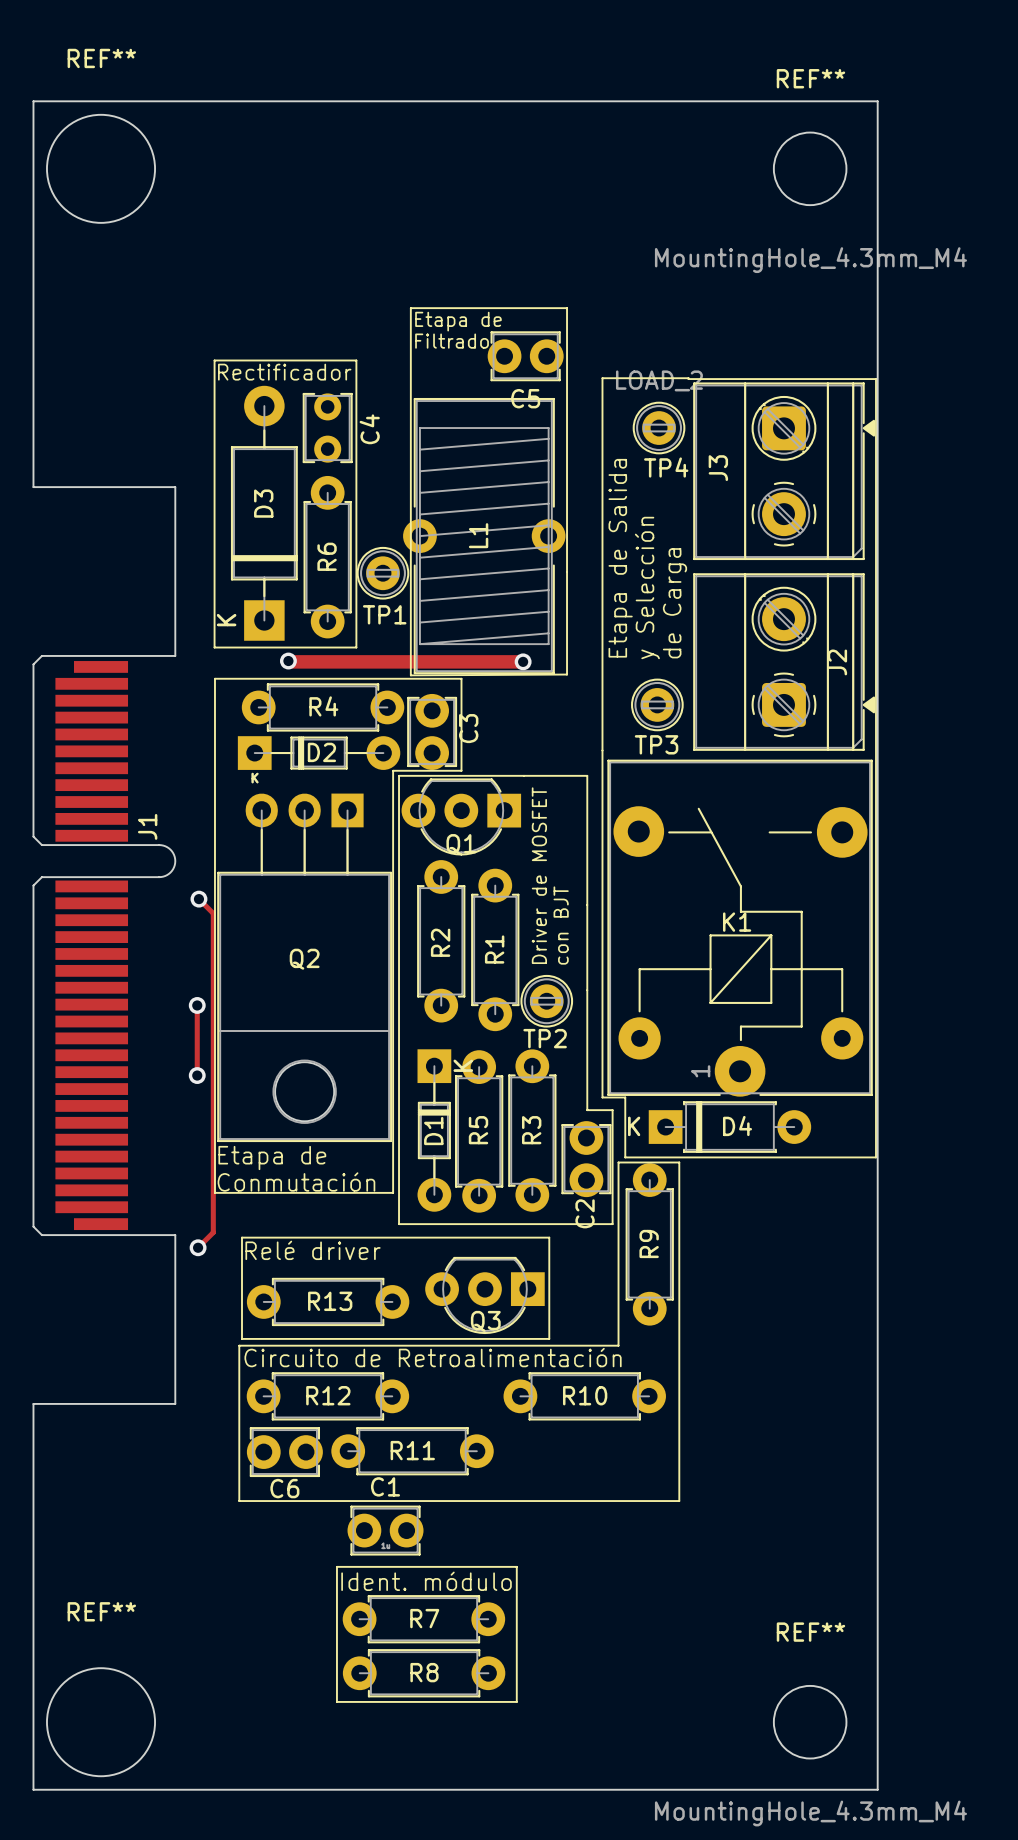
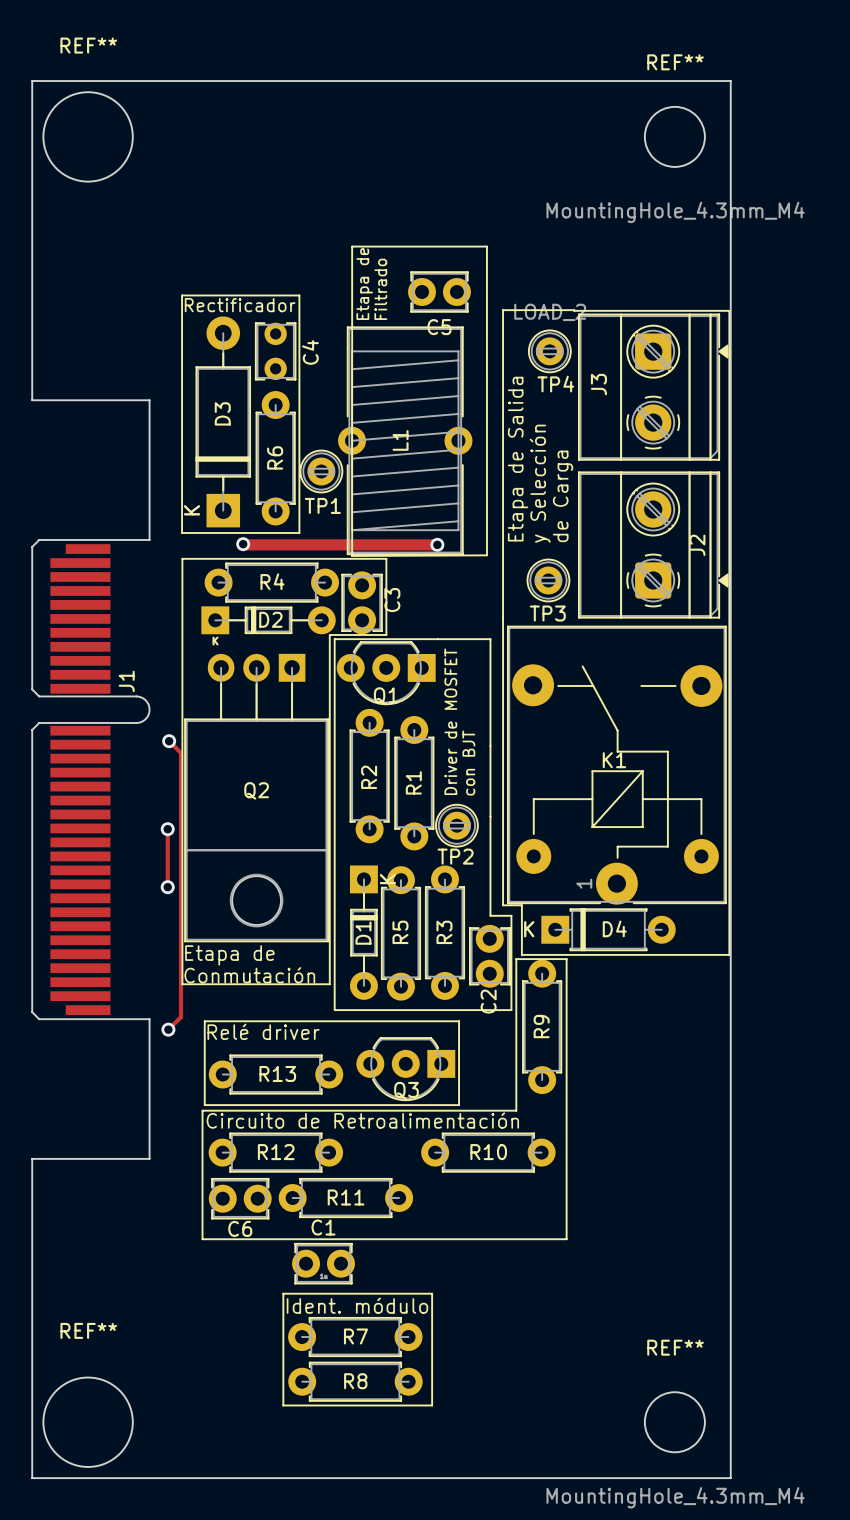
line: (410, 308) (567, 308) (567, 674) (410, 675) (410, 308) -> (352, 246) (352, 556) (486, 555) (486, 246) (352, 246)
text rotation: 0° (458, 321) -> 90° counterclockwise (364, 284)
text rotation: 0° (452, 341) -> 90° counterclockwise (380, 289)

